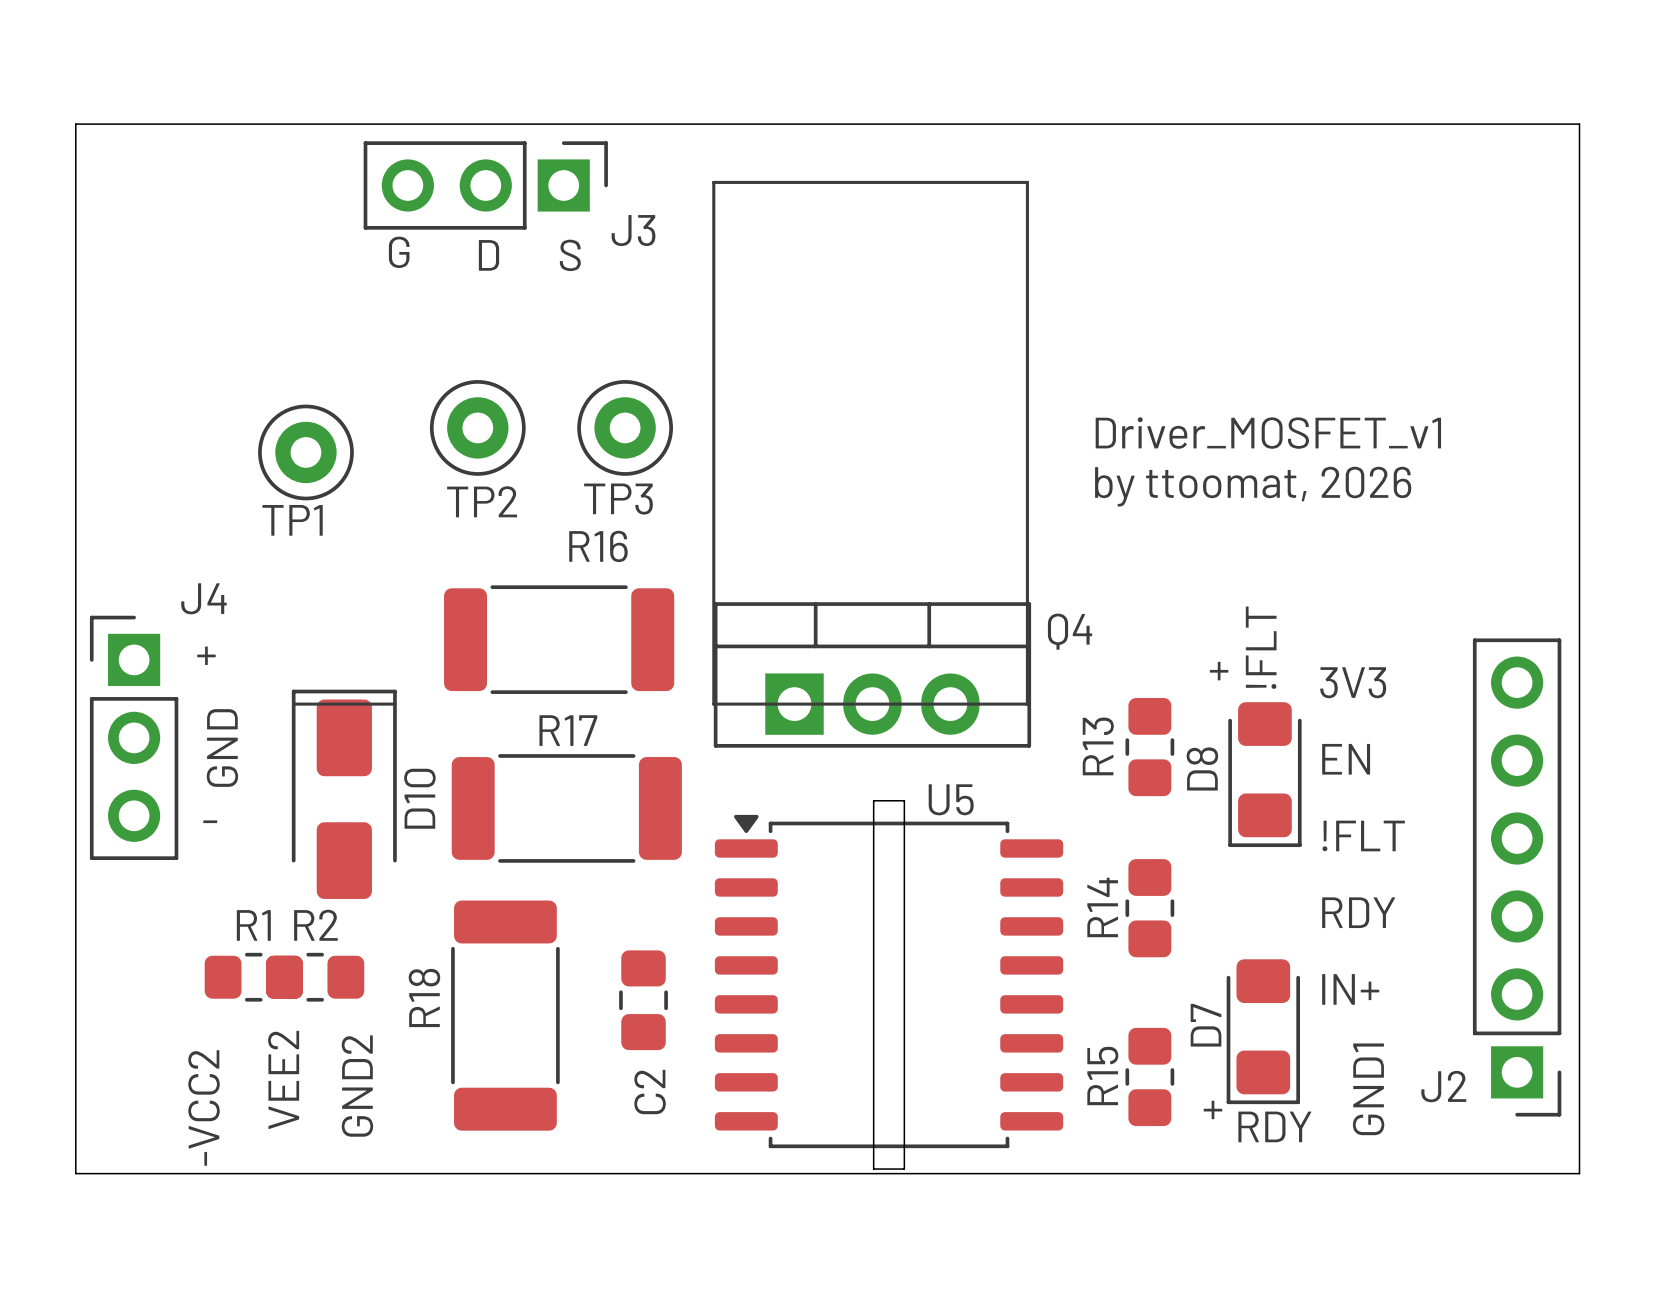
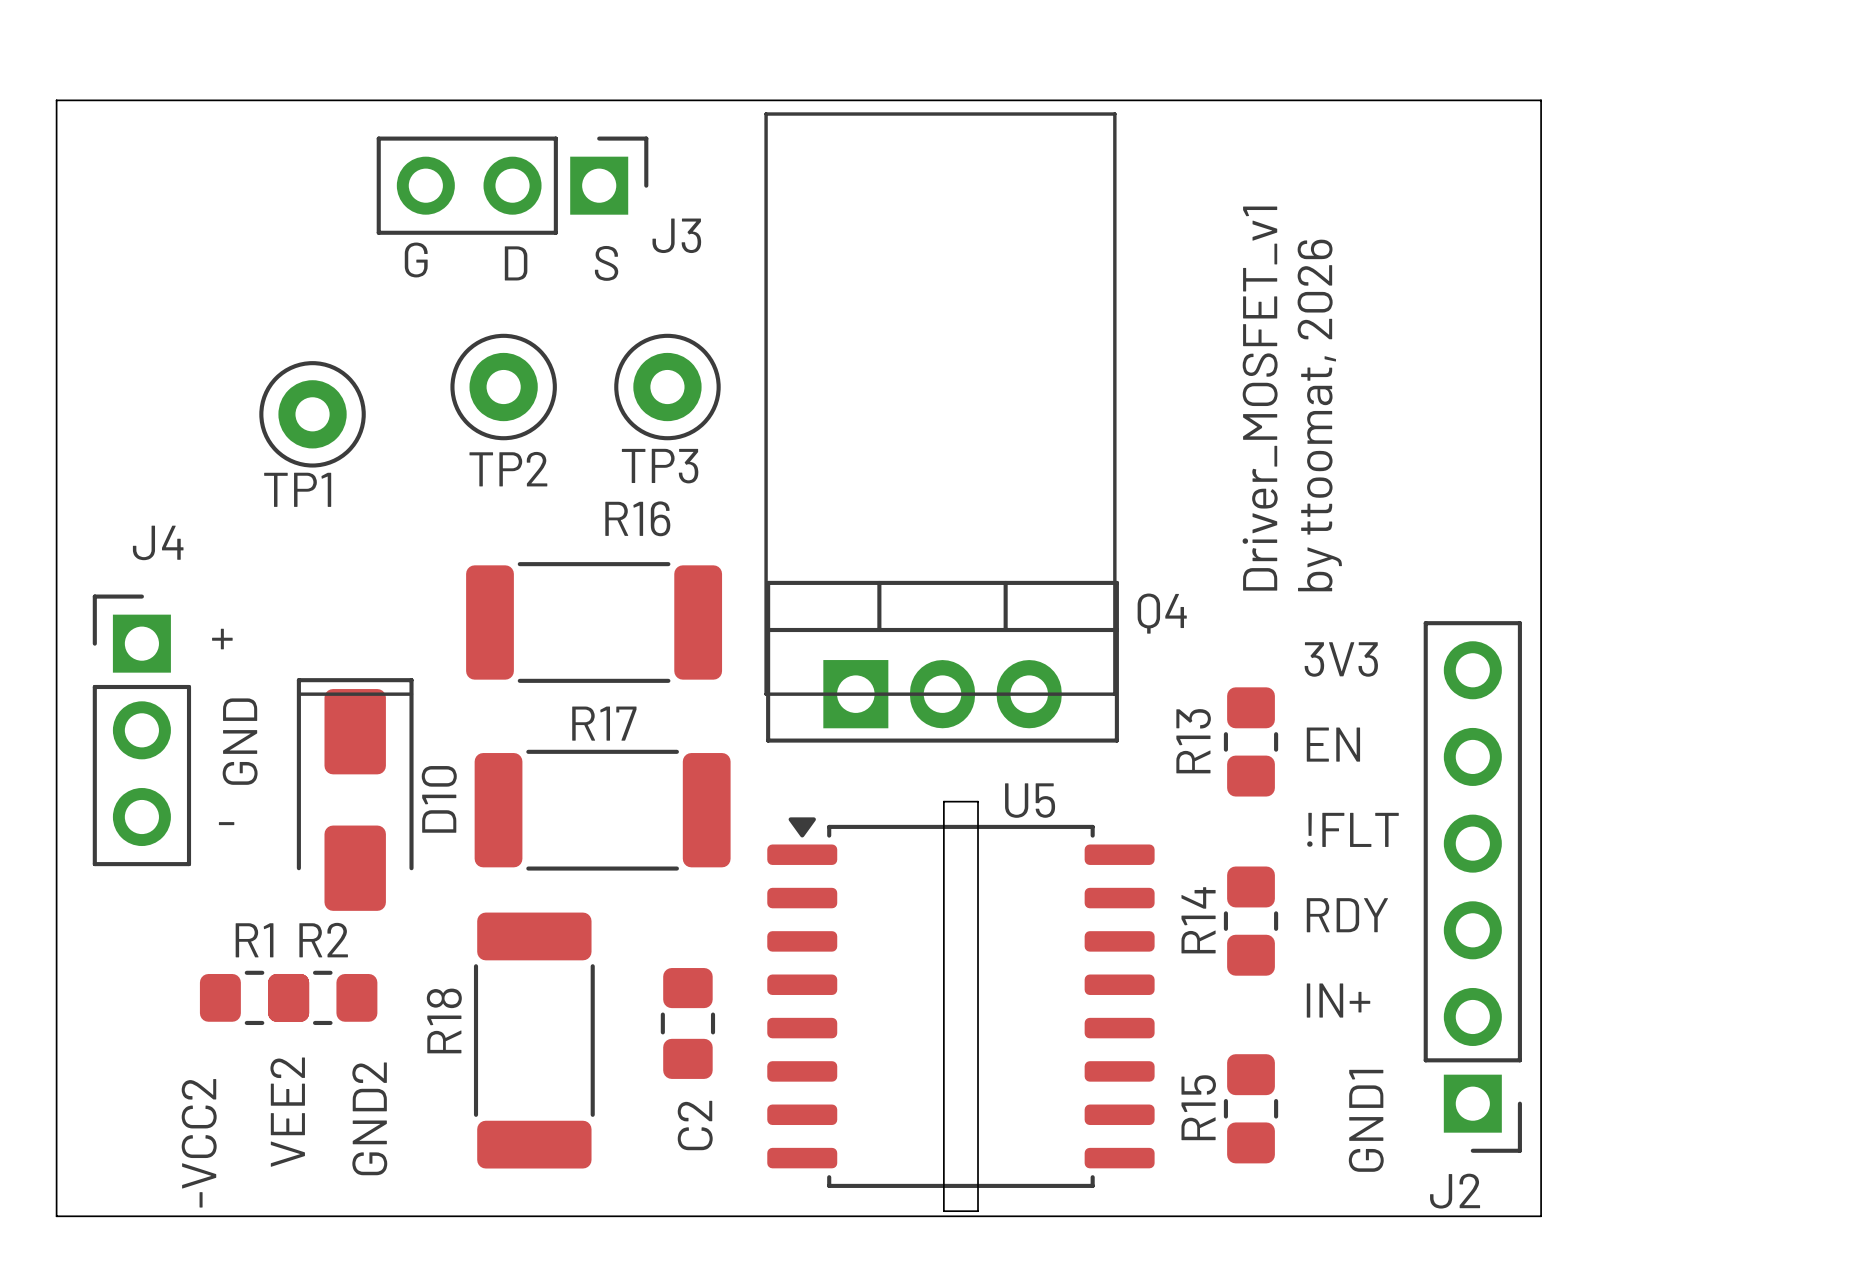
board edge: (75, 170) (75, 124) (1579, 124) (1579, 1173) (1410, 1173) -> (56, 100) (1541, 100) (1541, 1216)
J3 position: (485, 185) -> (512, 185)
text position: G (399, 252) -> G (416, 259)
text position: D (488, 255) -> D (516, 263)
text position: S (570, 255) -> S (606, 263)
text rotation: 0° (1268, 433) -> 90° counterclockwise (1260, 398)
text rotation: 0° (1253, 486) -> 90° counterclockwise (1319, 415)
J4 name position: J4 (203, 598) -> J4 (158, 542)
text: !FLT (1261, 647) -> none
text position: + (206, 655) -> + (222, 639)
text: + (1219, 671) -> none
text position: 3V3 (1353, 682) -> 3V3 (1341, 659)
J4 position: (134, 737) -> (141, 730)
text position: GND (222, 748) -> GND (240, 741)
text position: EN (1346, 759) -> EN (1333, 744)
D8: (1264, 774) -> none
text position: - (210, 821) -> - (226, 823)
text position: !FLT (1363, 835) -> !FLT (1352, 829)
J2 position: (1517, 877) -> (1472, 886)
text: none -> RDY (1347, 915)
text: RDY (1358, 912) -> none
text position: IN+ (1350, 989) -> IN+ (1338, 1000)
D7: (1263, 1031) -> none
J2 name position: J2 (1443, 1086) -> J2 (1455, 1191)
text position: GND1 (1368, 1089) -> GND1 (1366, 1120)
text: + (1212, 1109) -> none
text: RDY (1274, 1126) -> none

